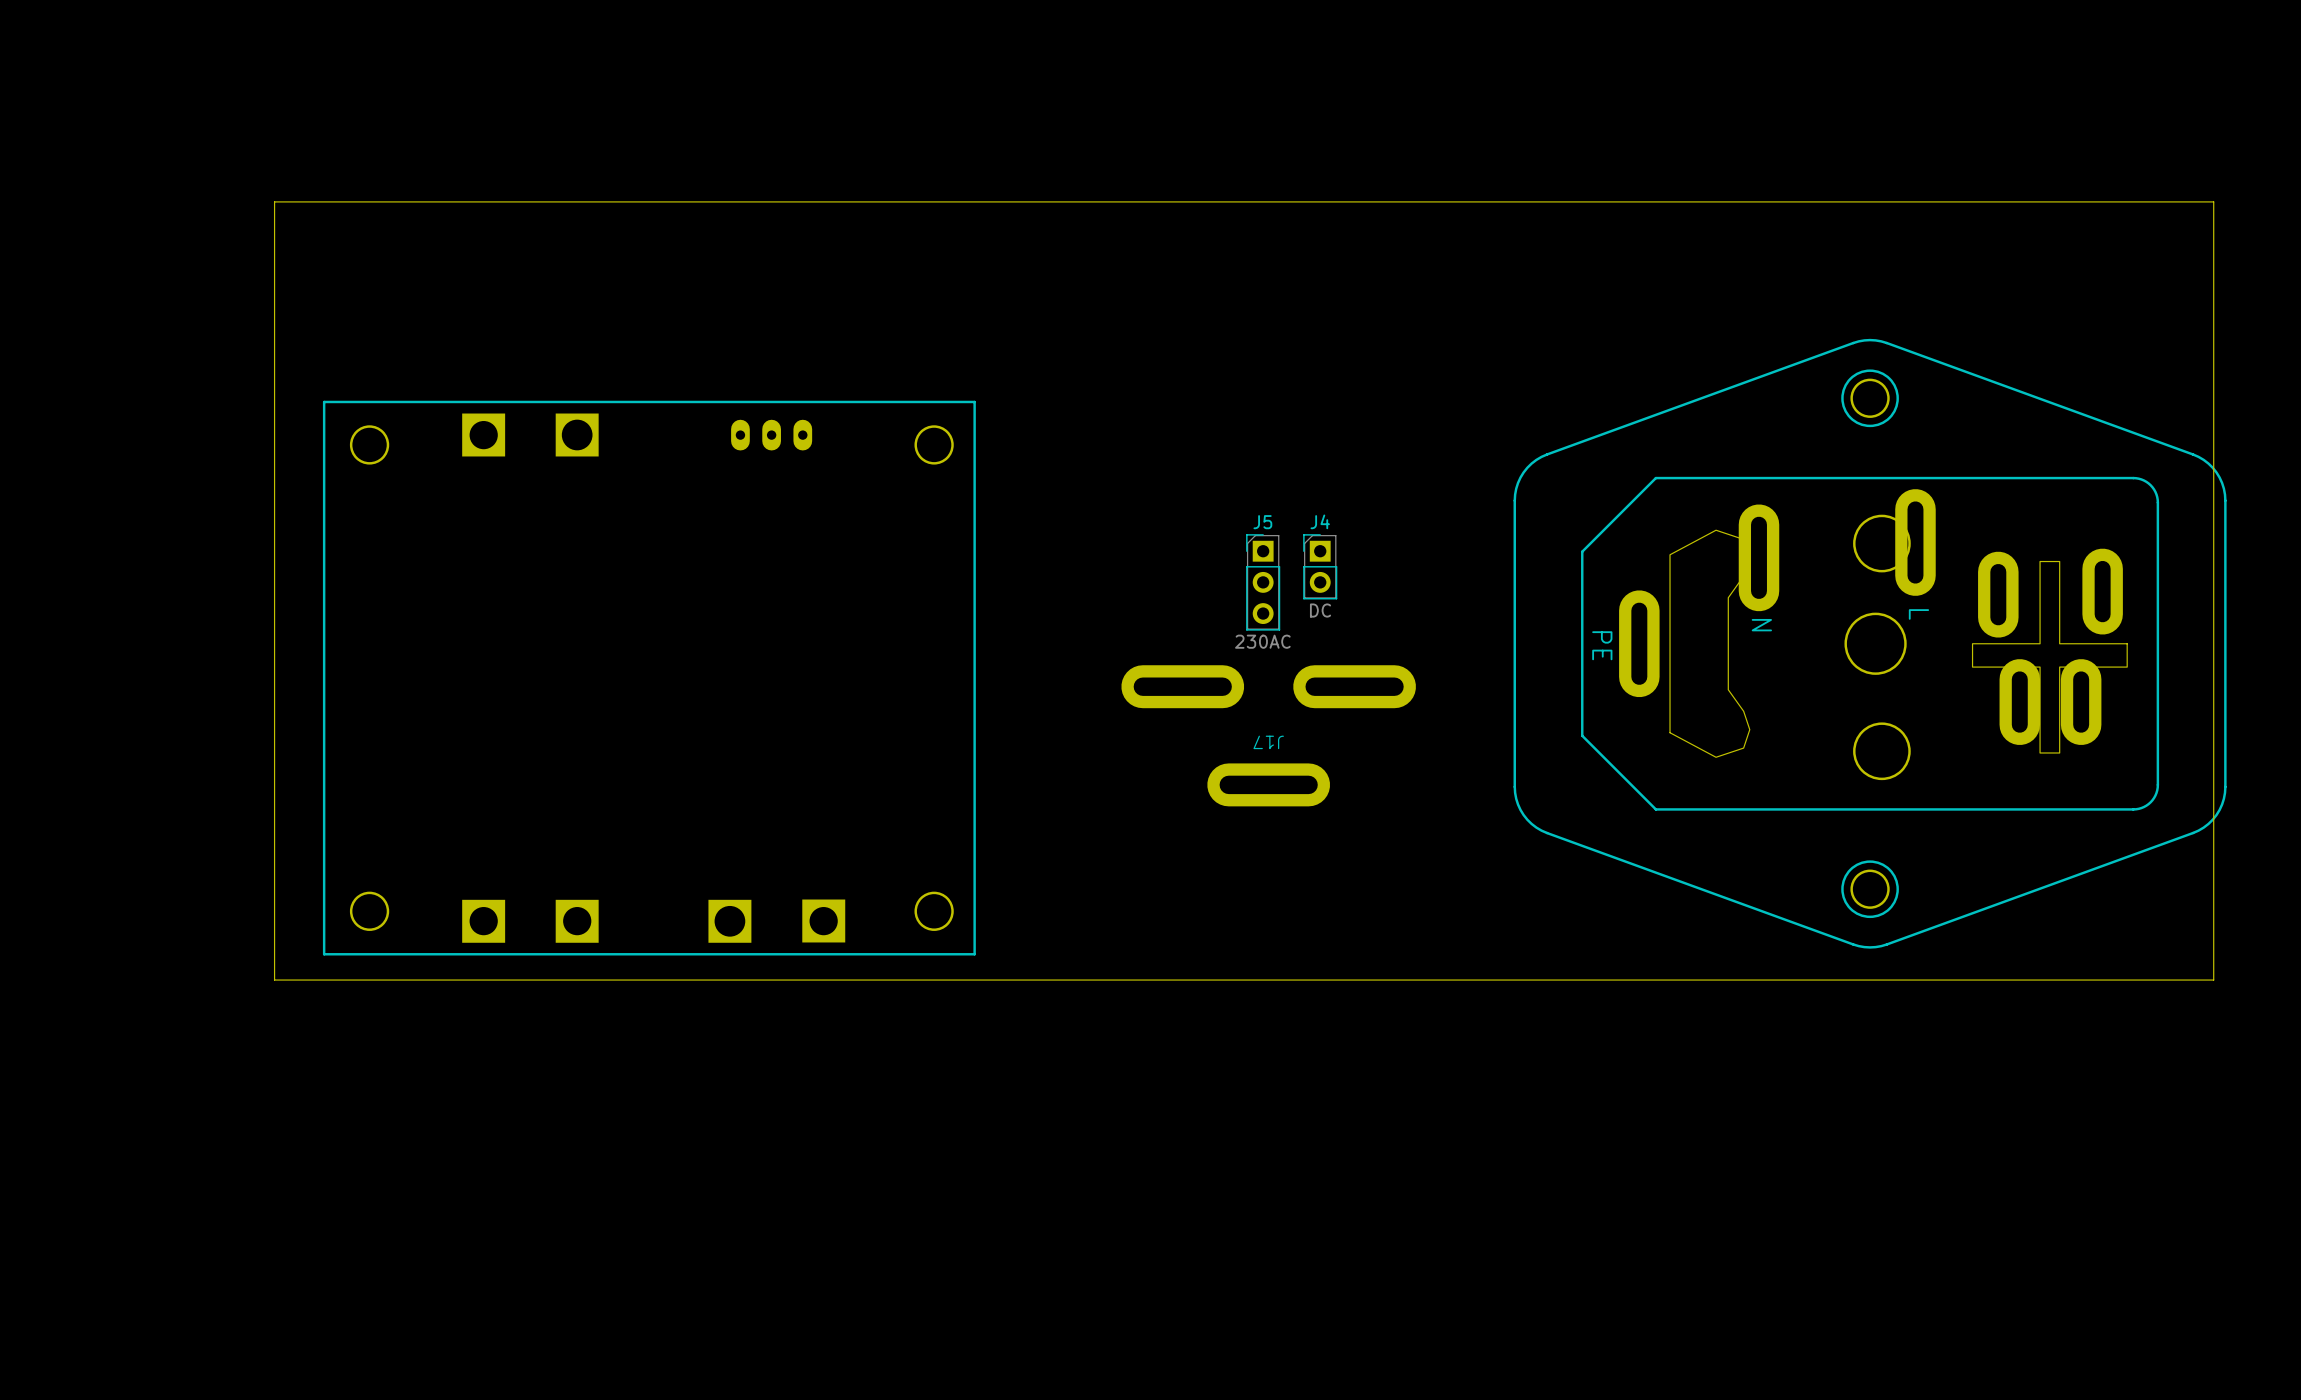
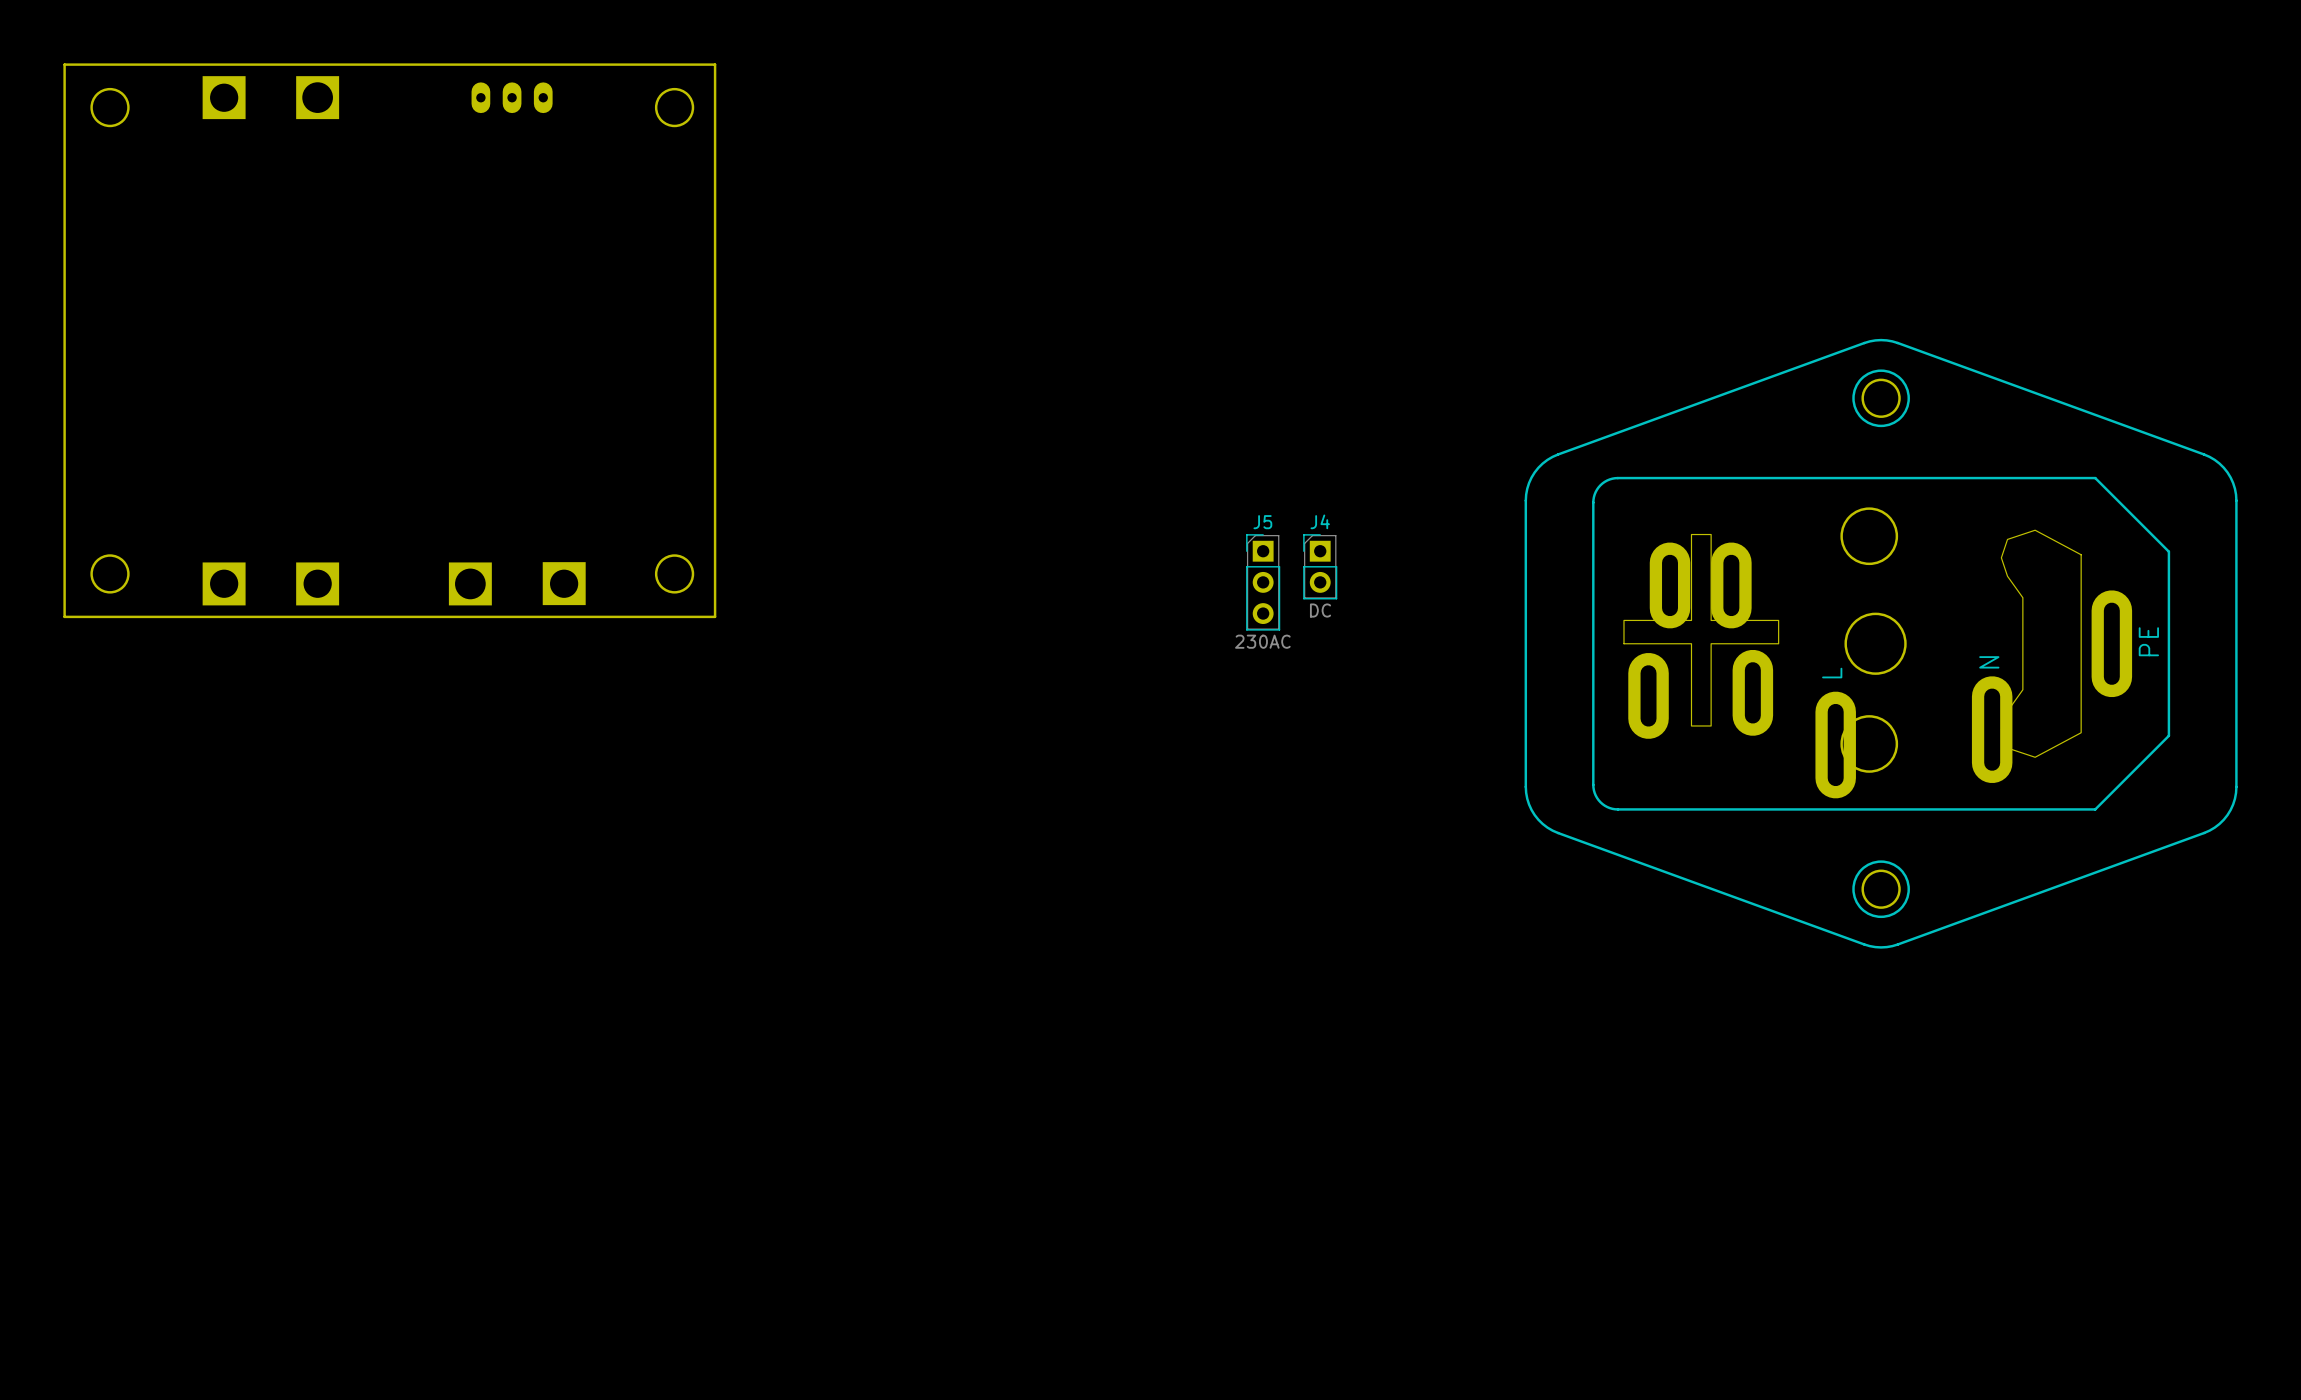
board edge: (274, 201) (2213, 201) (2213, 980) (274, 980) (274, 201) -> none
part: none -> (389, 340)
part rotation: 0° (1870, 643) -> 180° (1881, 643)
part: (649, 678) -> none
J17: (1268, 735) -> none

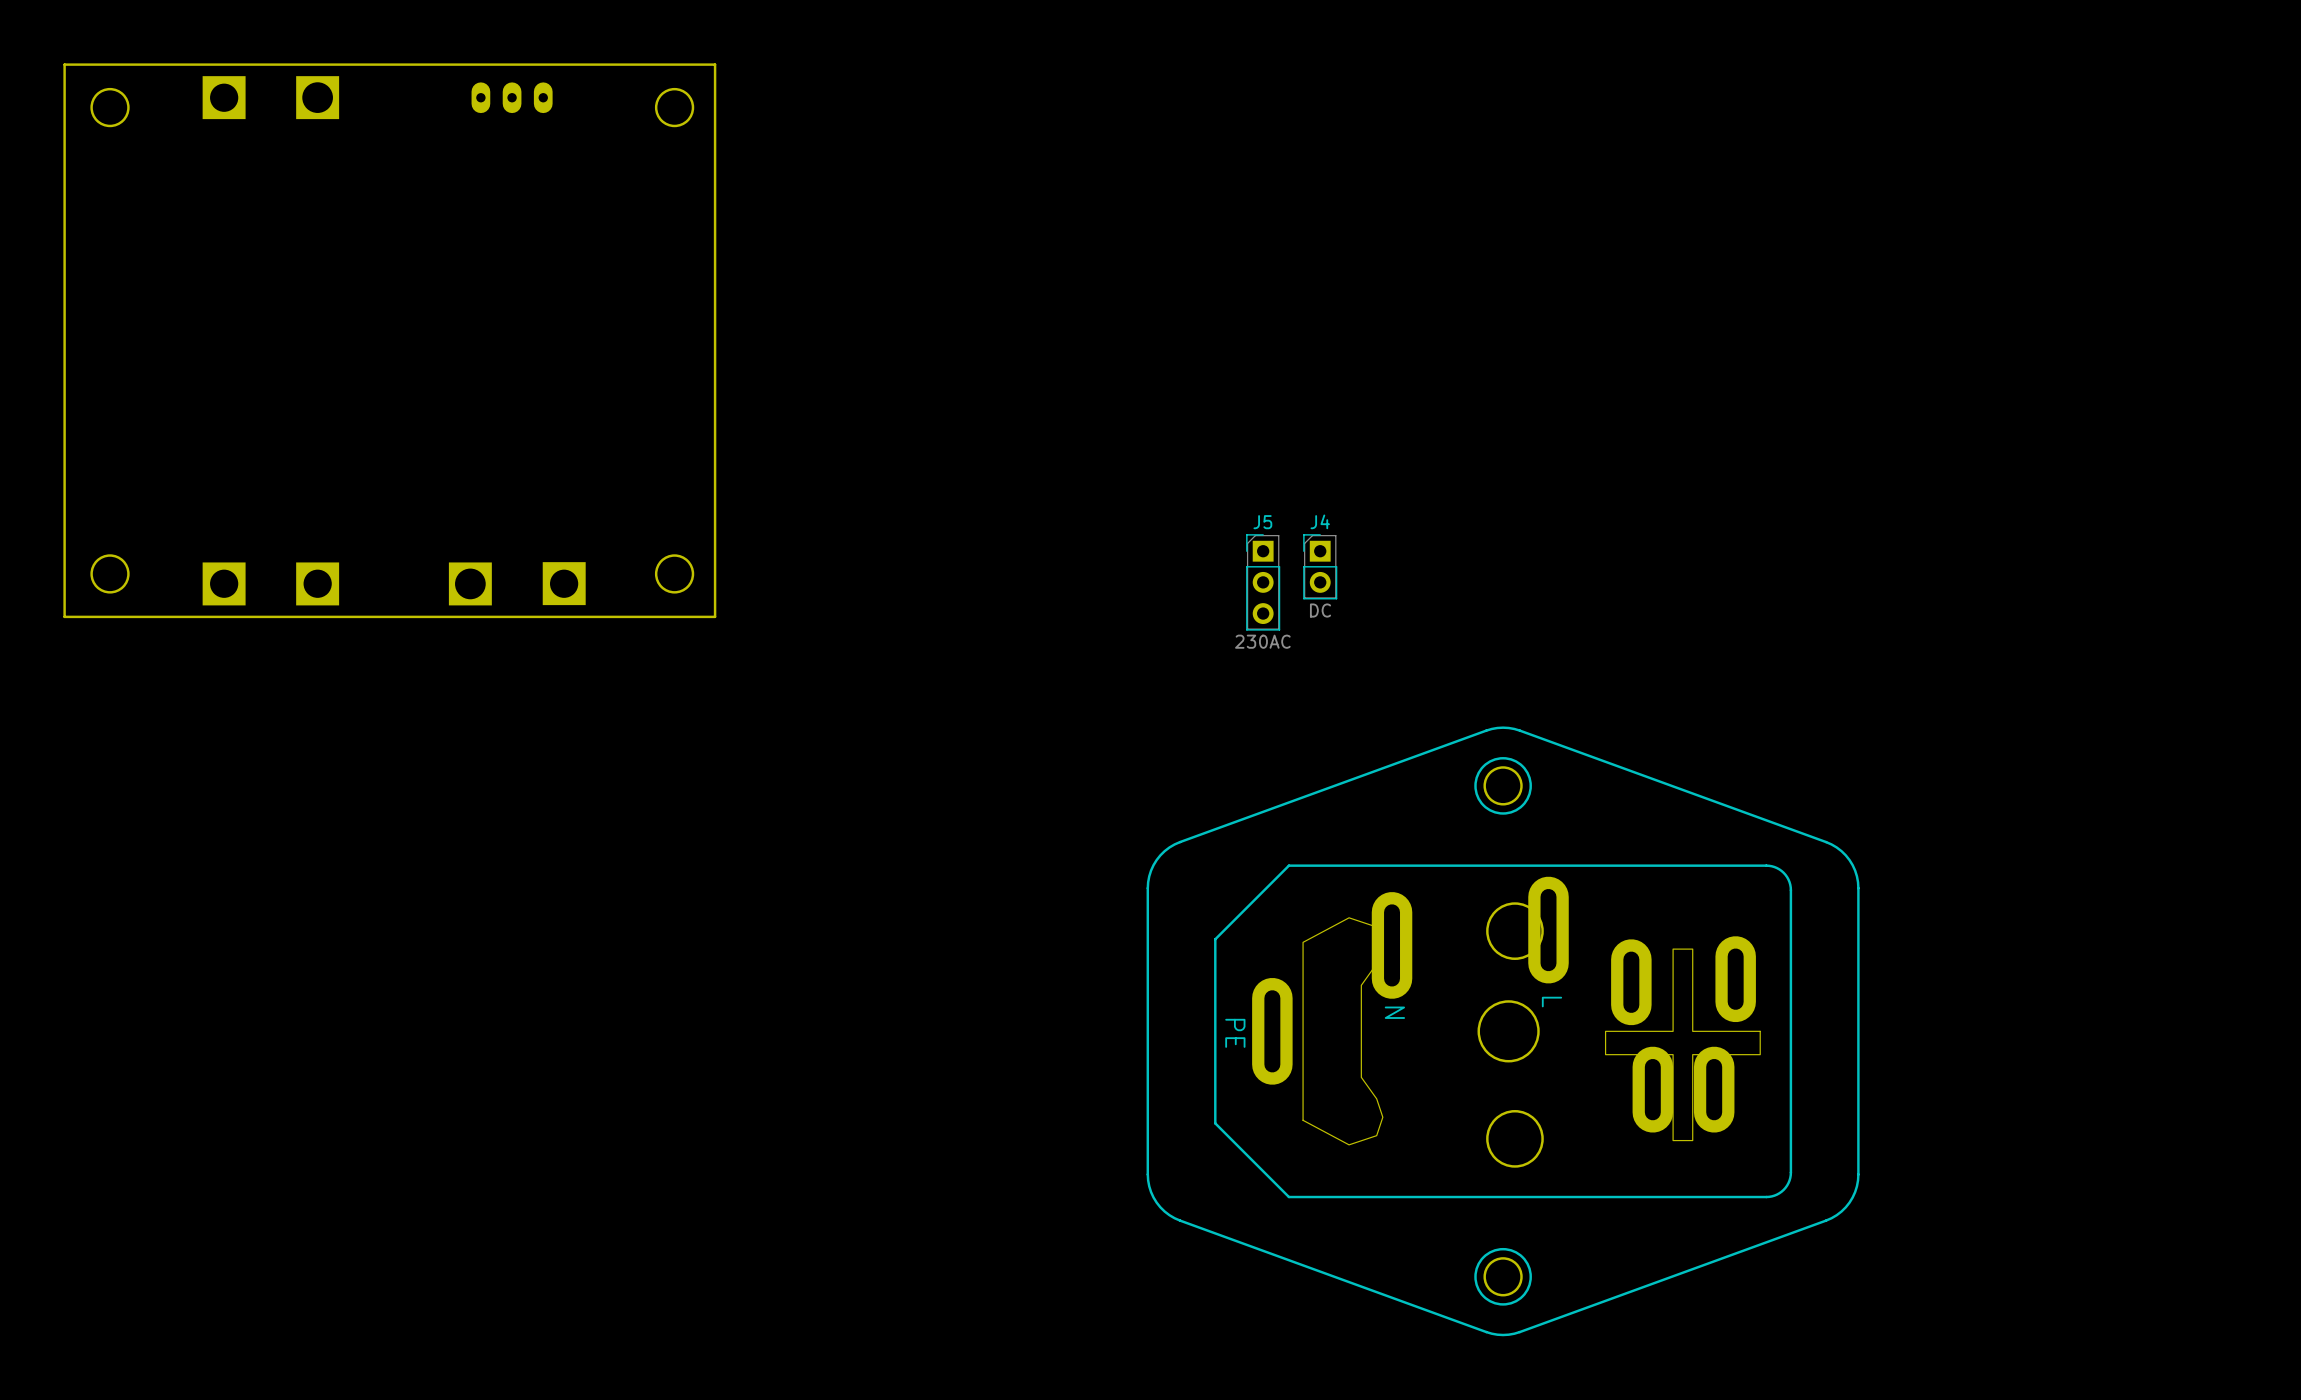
part: (1881, 643) -> none
part: none -> (1503, 1031)

